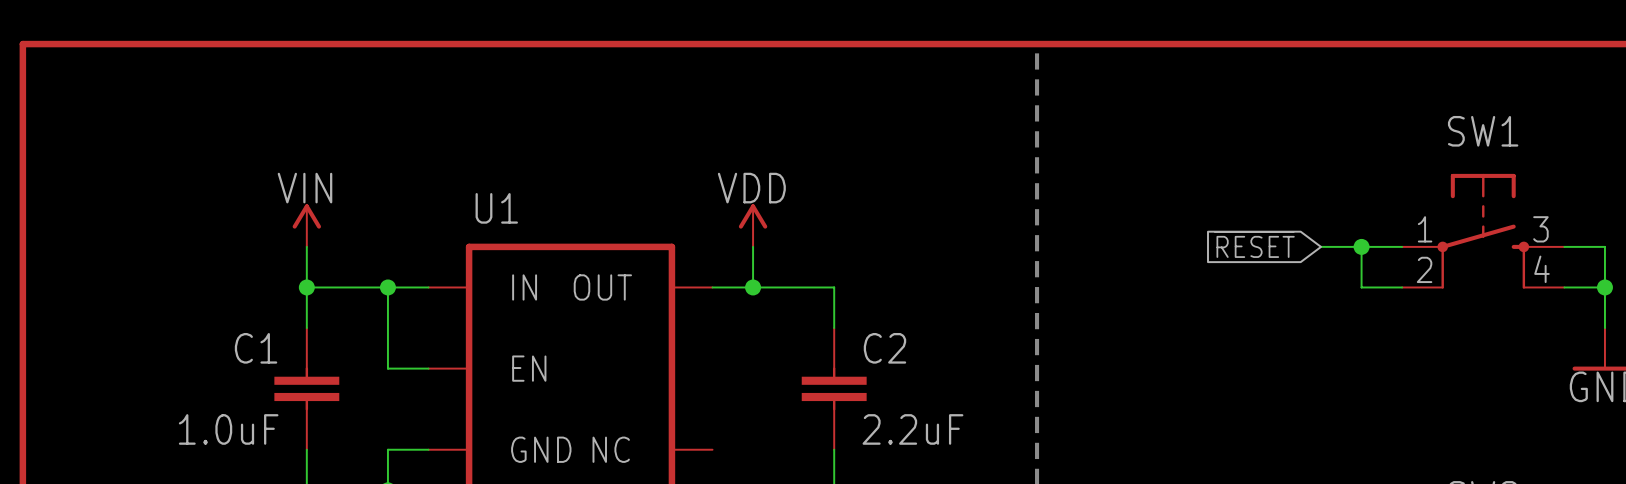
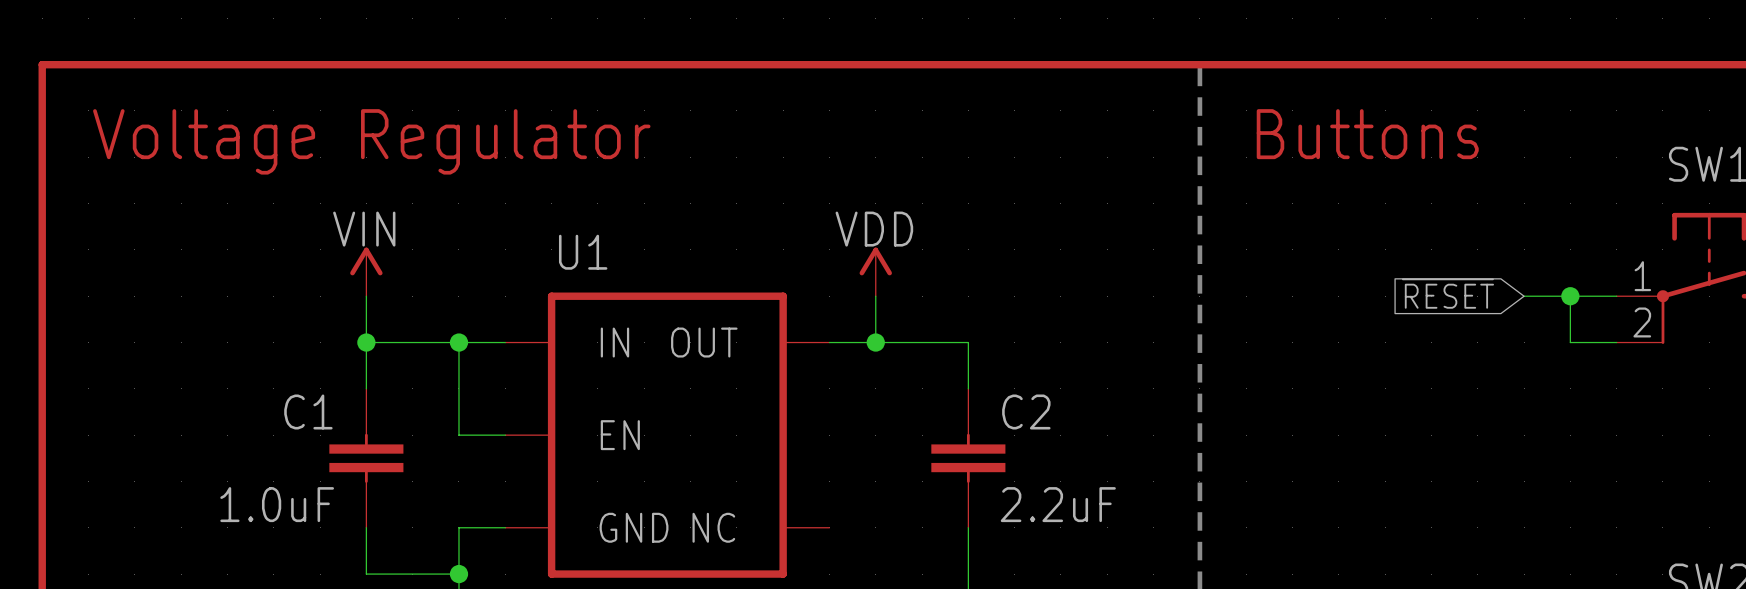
text: none -> Buttons (1367, 134)
text: none -> Voltage Regulator (371, 141)

